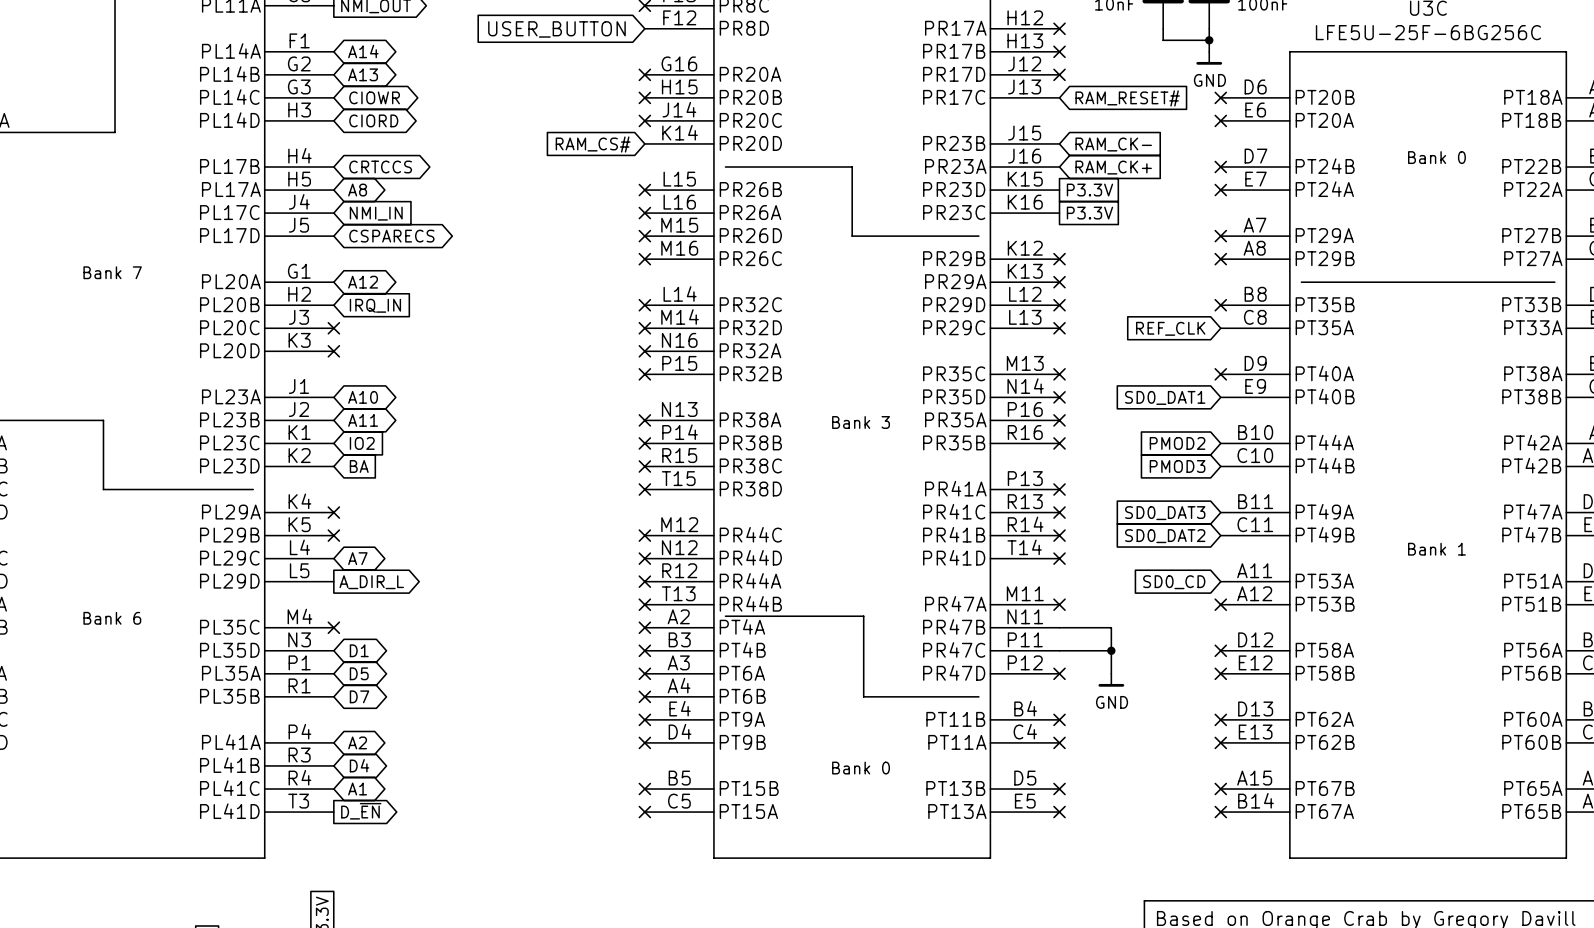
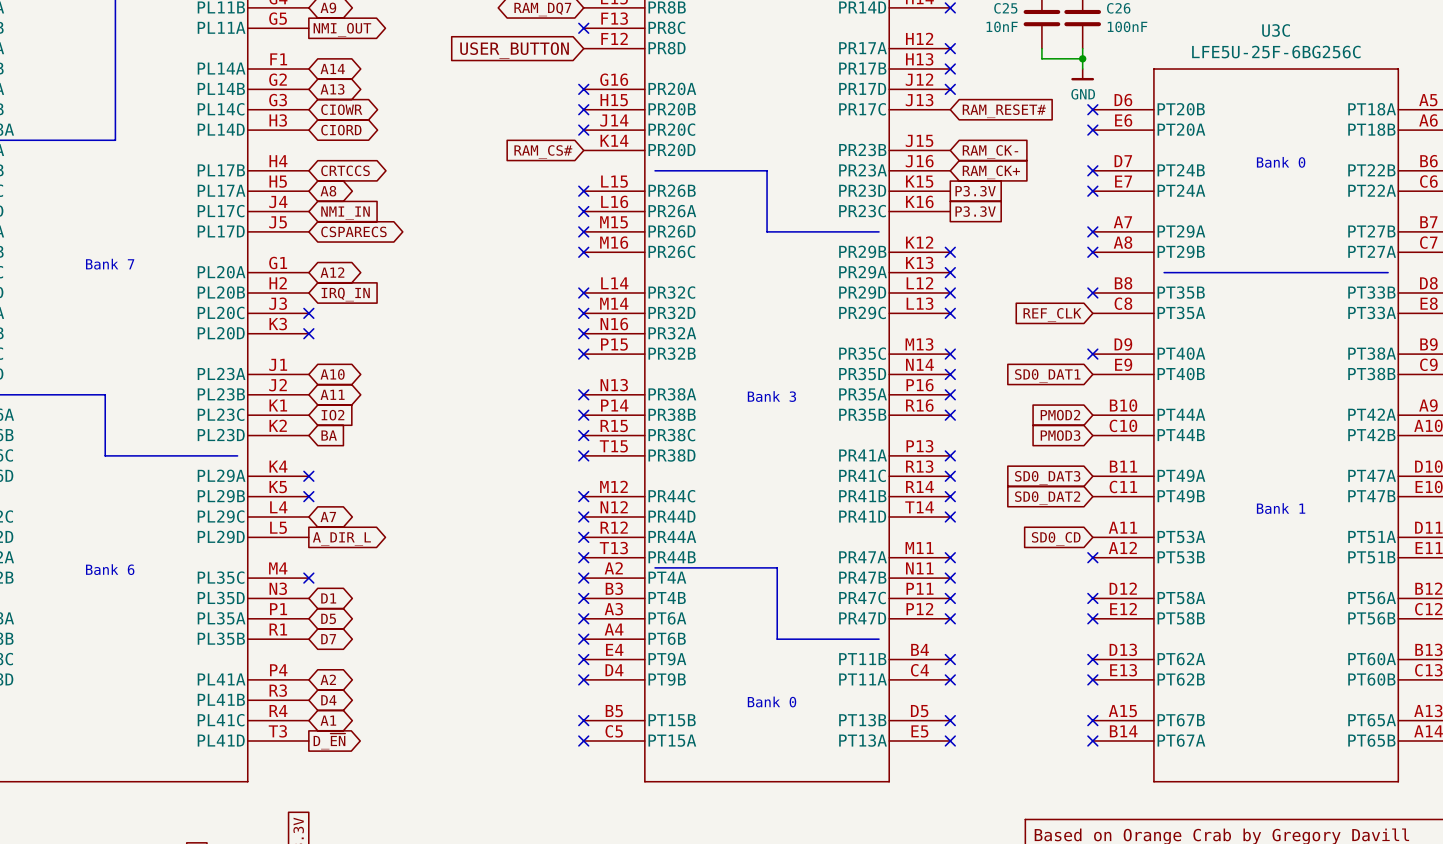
wire: (1059, 627) (1111, 627) (1111, 673) -> none
no-connect mark: none -> (950, 578)
wire: (1059, 650) (1111, 650) -> none
no-connect mark: none -> (950, 598)
junction: (1111, 650) -> none
power symbol: GND (1111, 680) -> none

